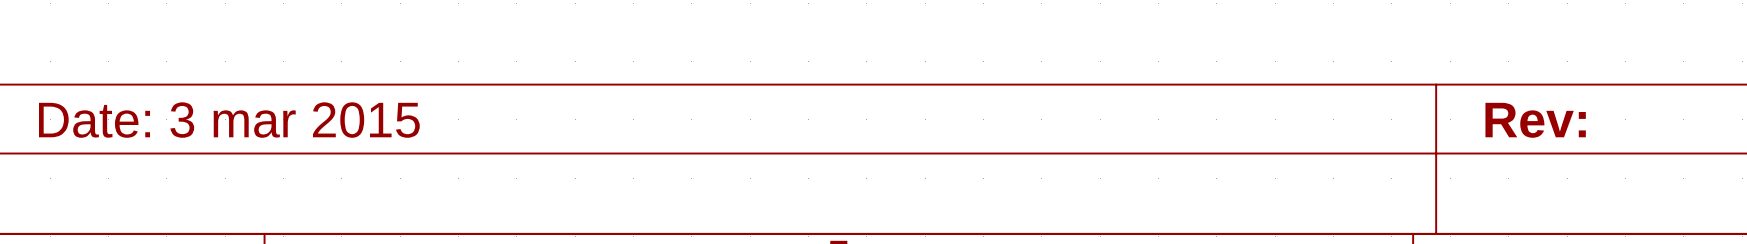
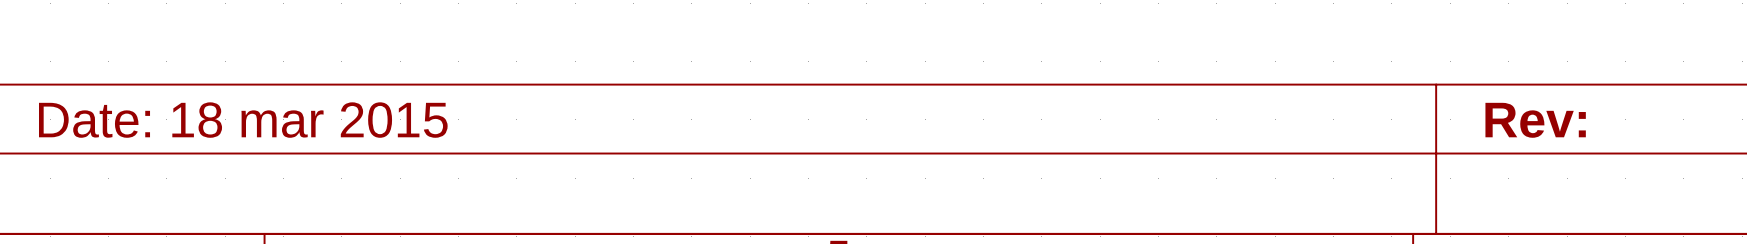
title block: Date: 3 mar 2015 (229, 120) -> Date: 18 mar 2015 (243, 120)

